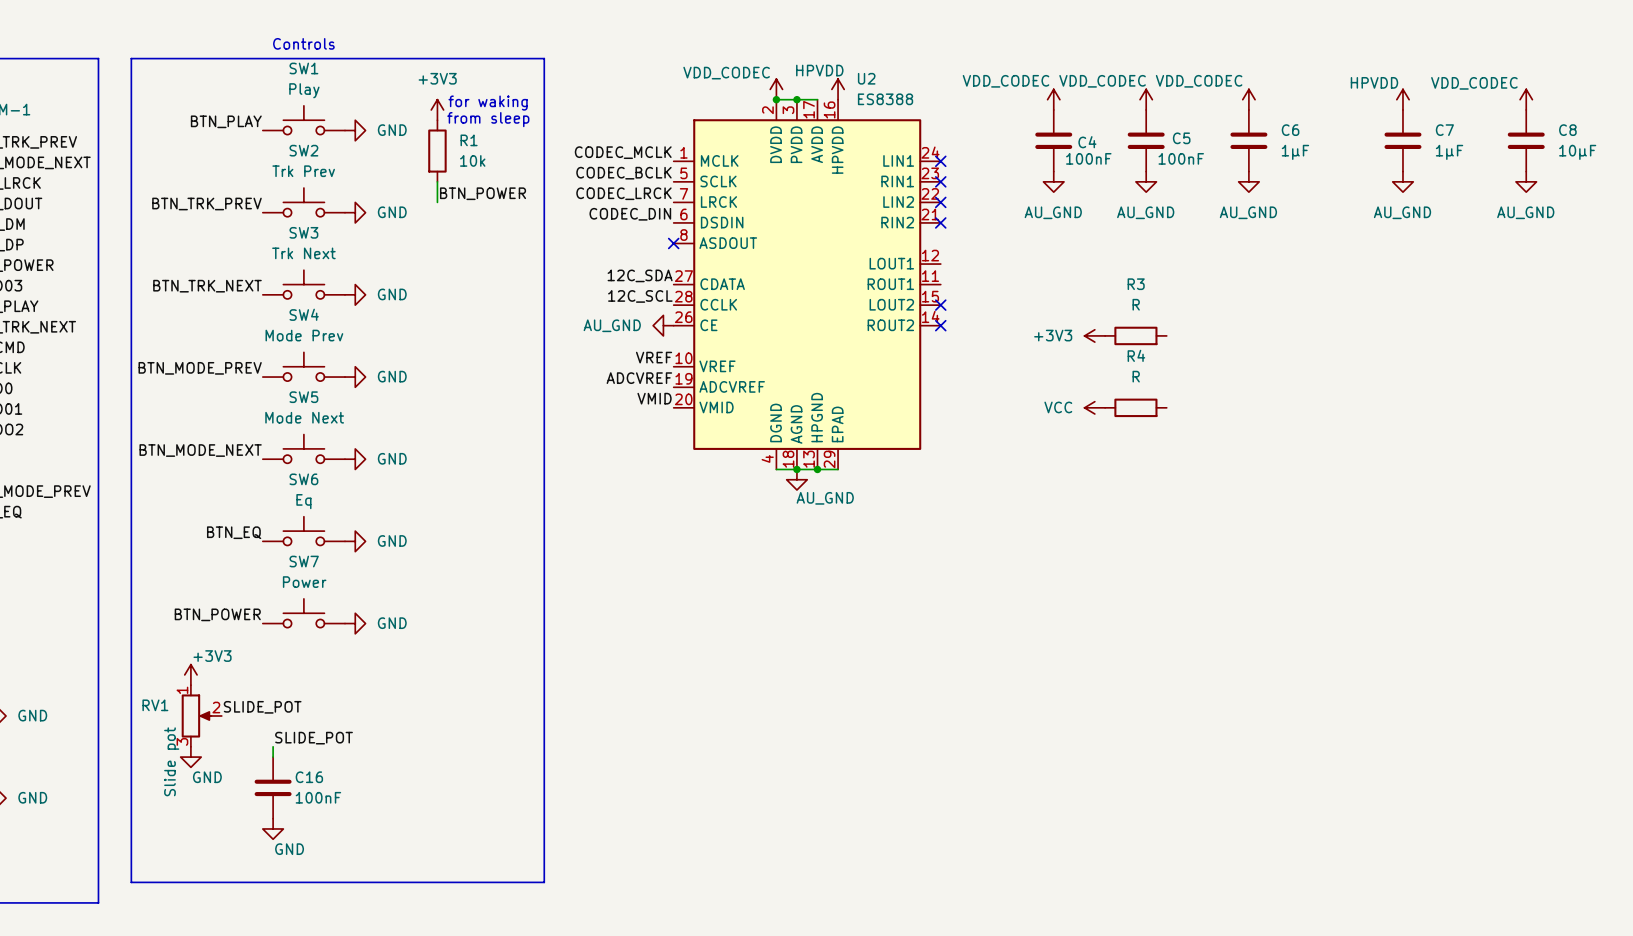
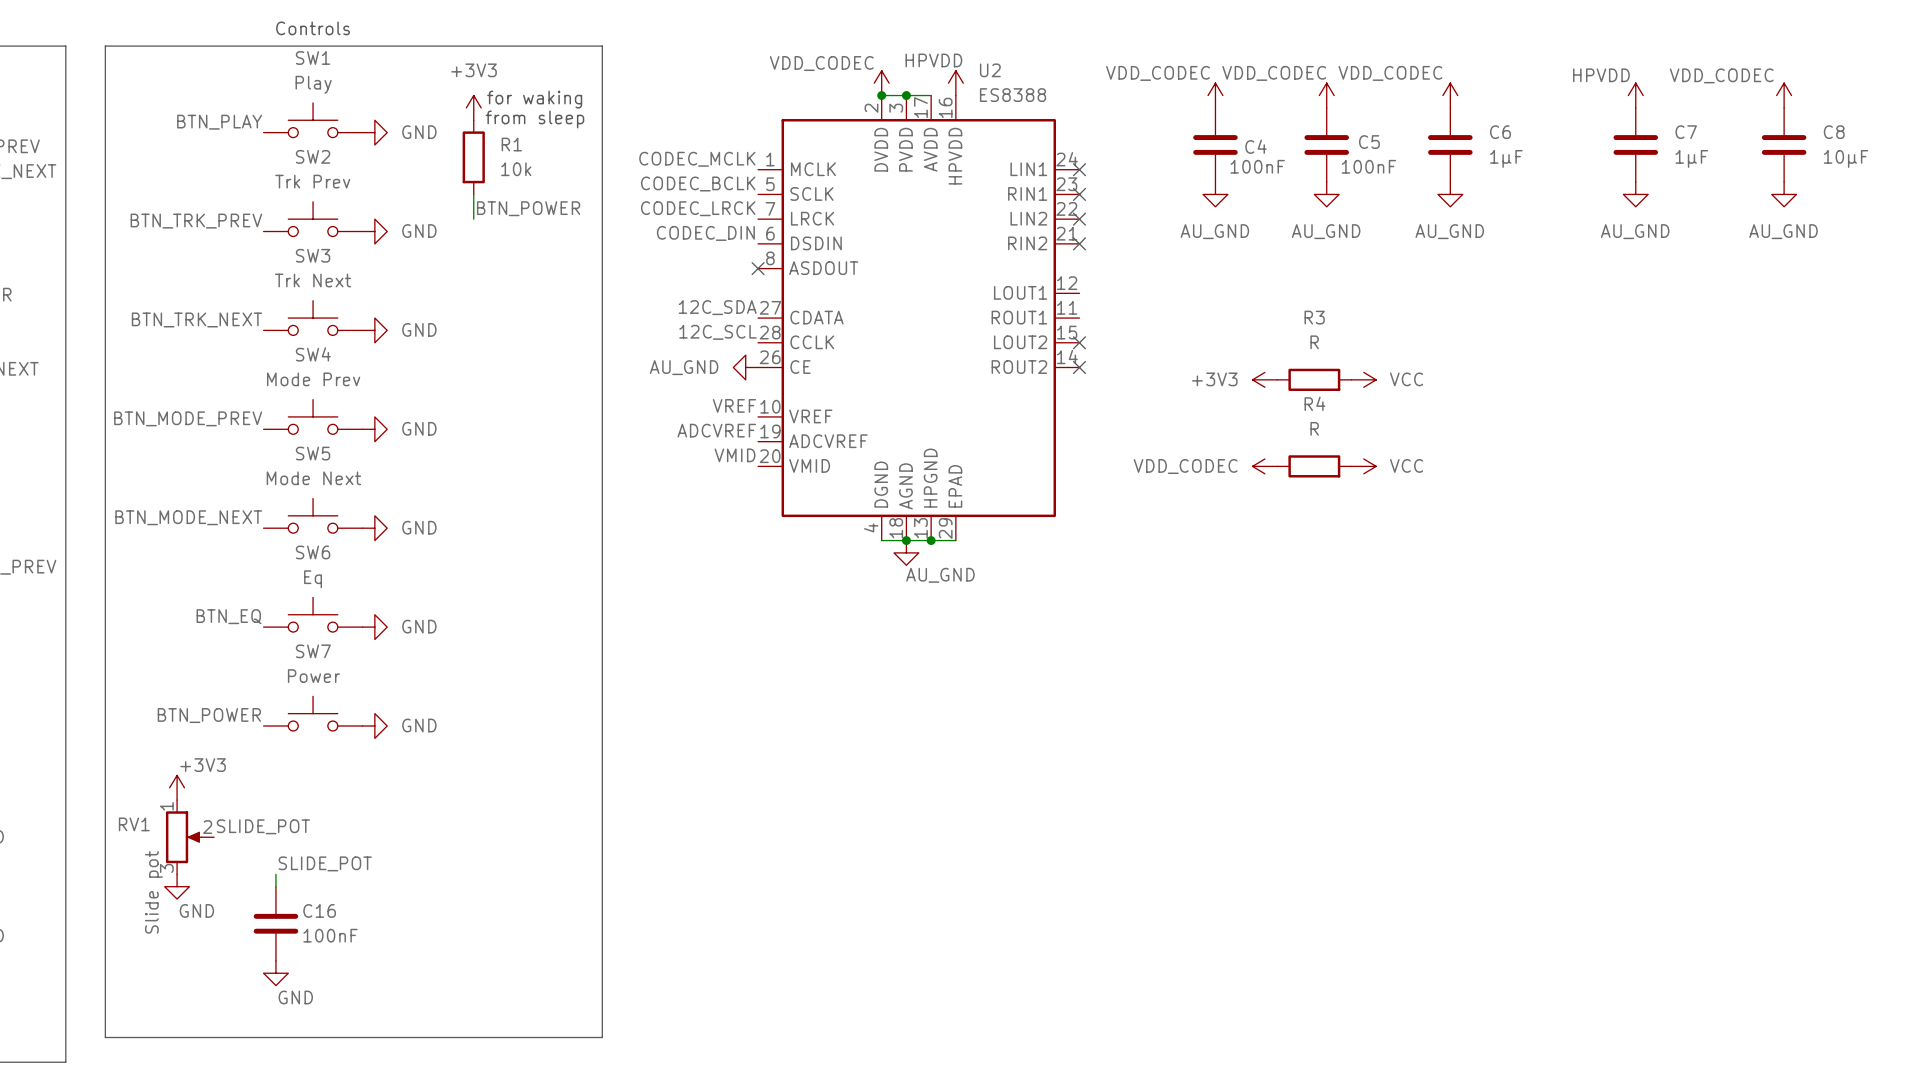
power symbol: none -> VCC (1363, 379)
power symbol: VCC (1094, 407) -> VDD_CODEC (1264, 466)
power symbol: none -> VCC (1363, 466)

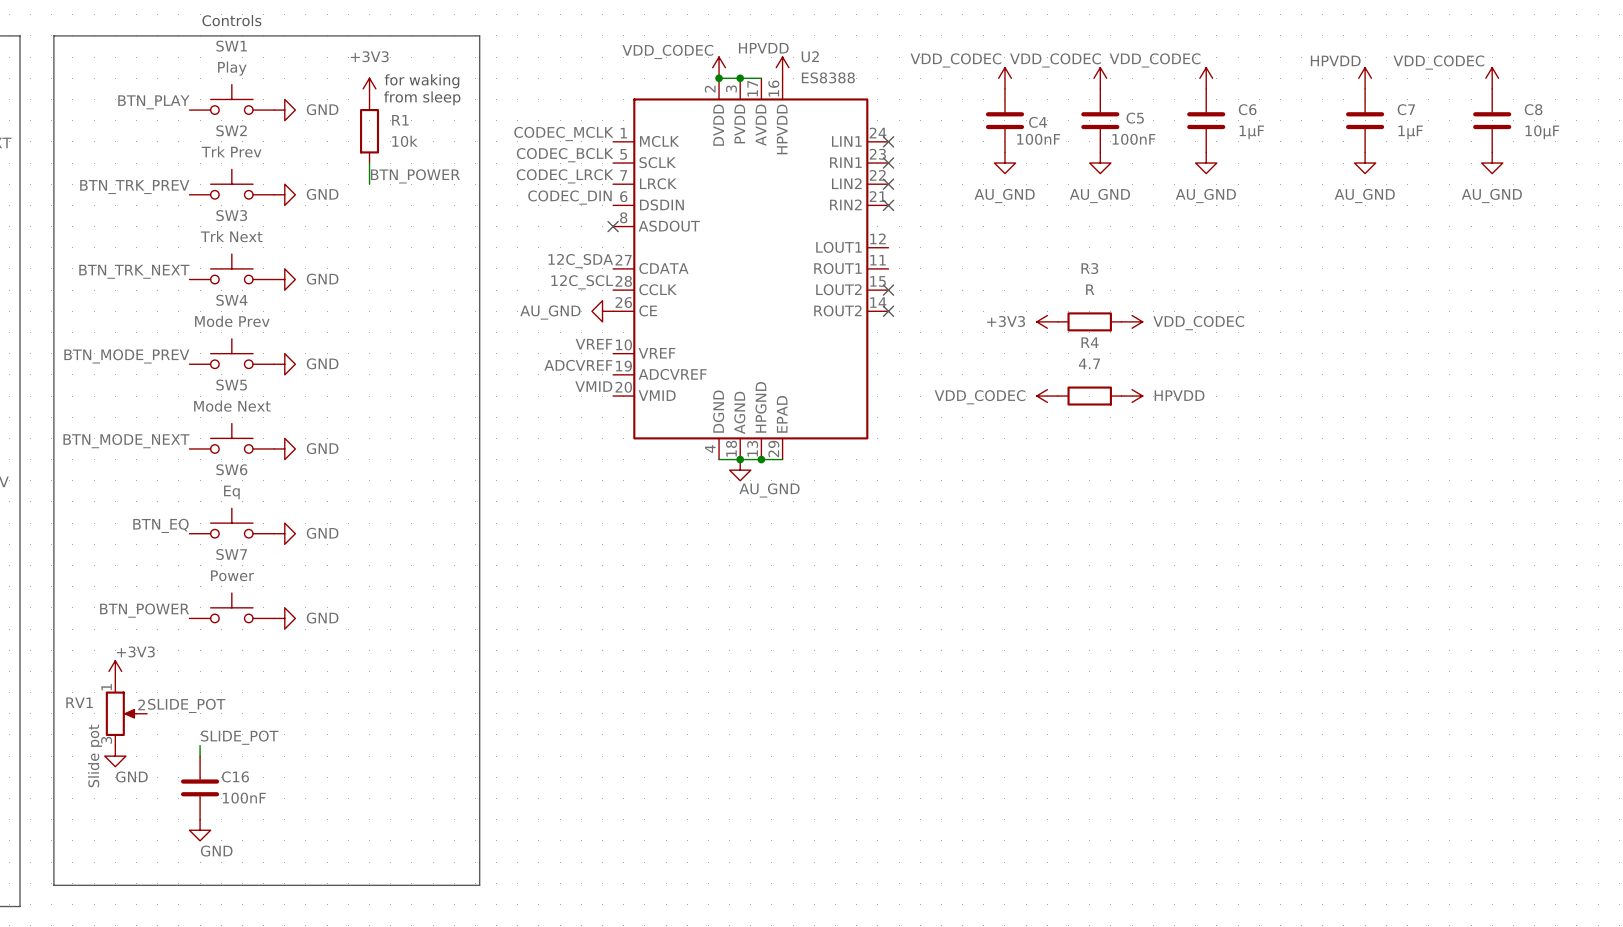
power symbol: VCC (1363, 379) -> VDD_CODEC (1132, 321)
R4 value: R (1314, 428) -> 4.7 (1089, 363)
power symbol: VCC (1363, 466) -> HPVDD (1132, 396)

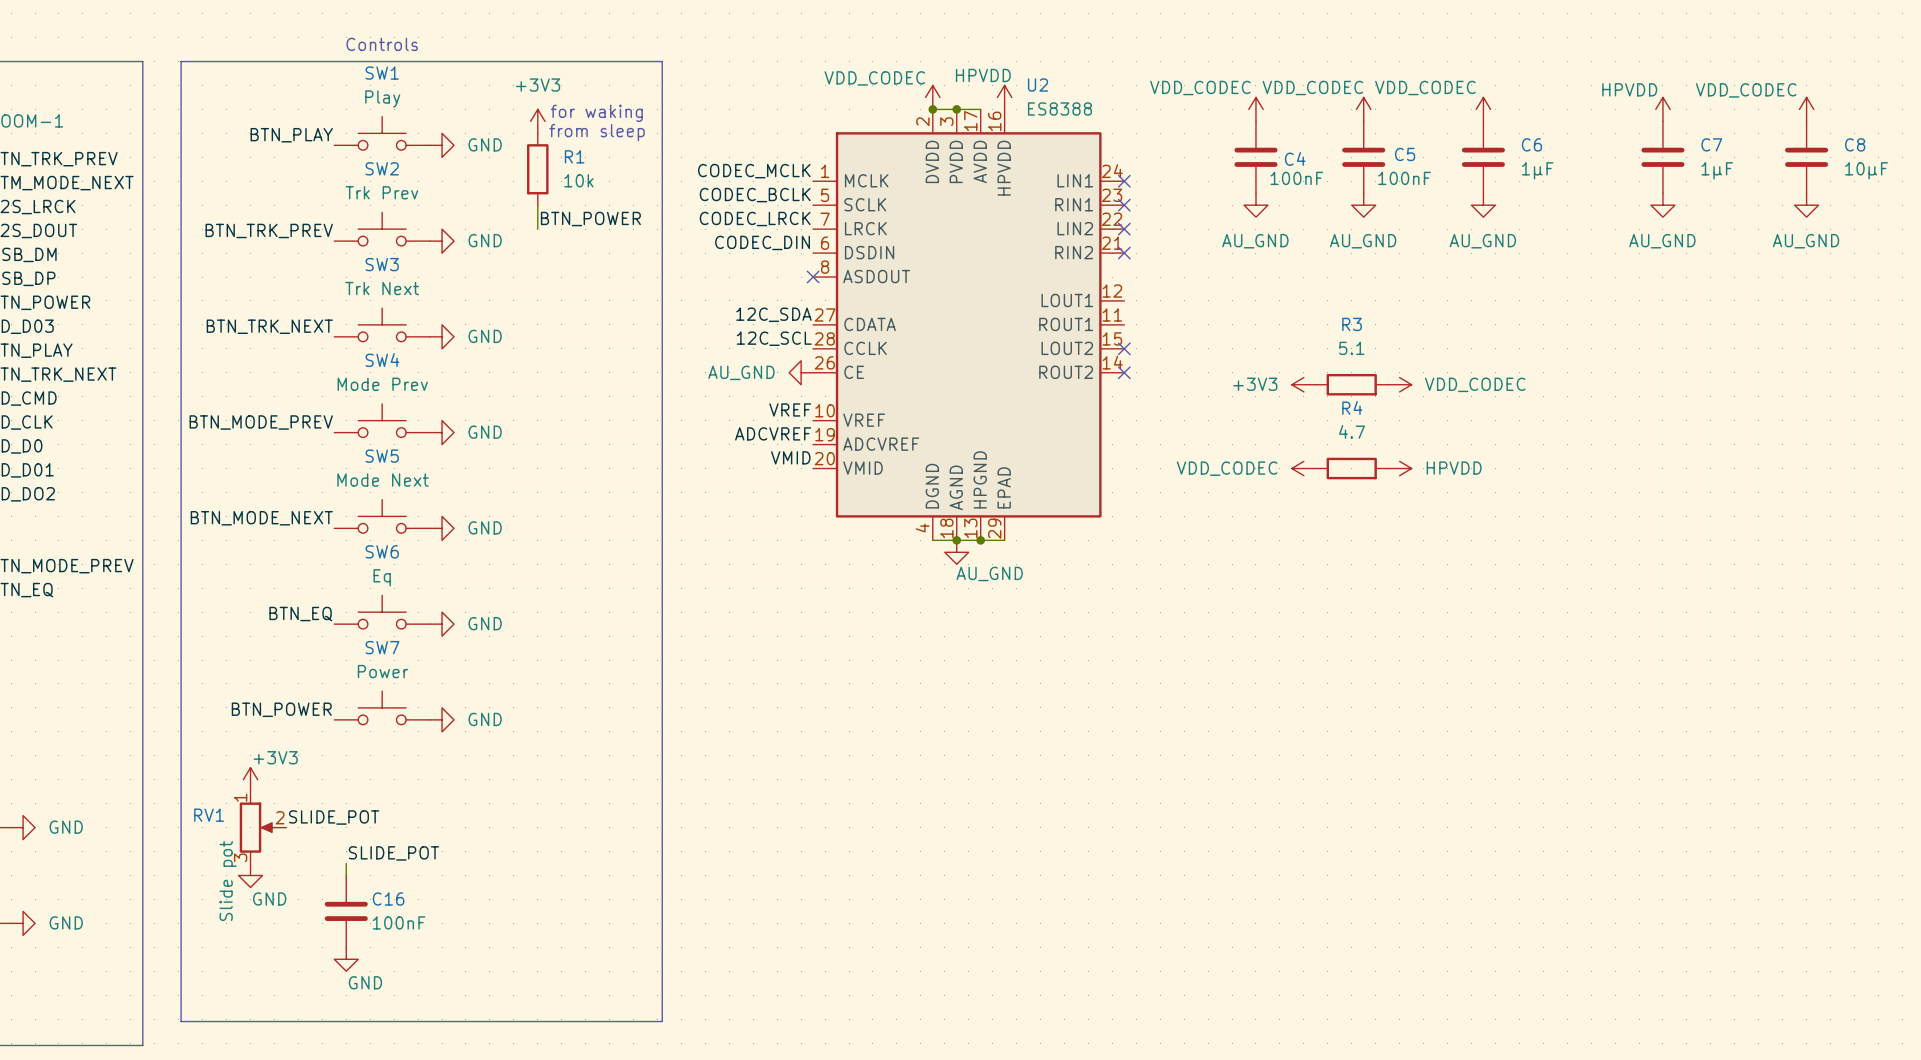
R3 value: R (1090, 289) -> 5.1 (1351, 348)

